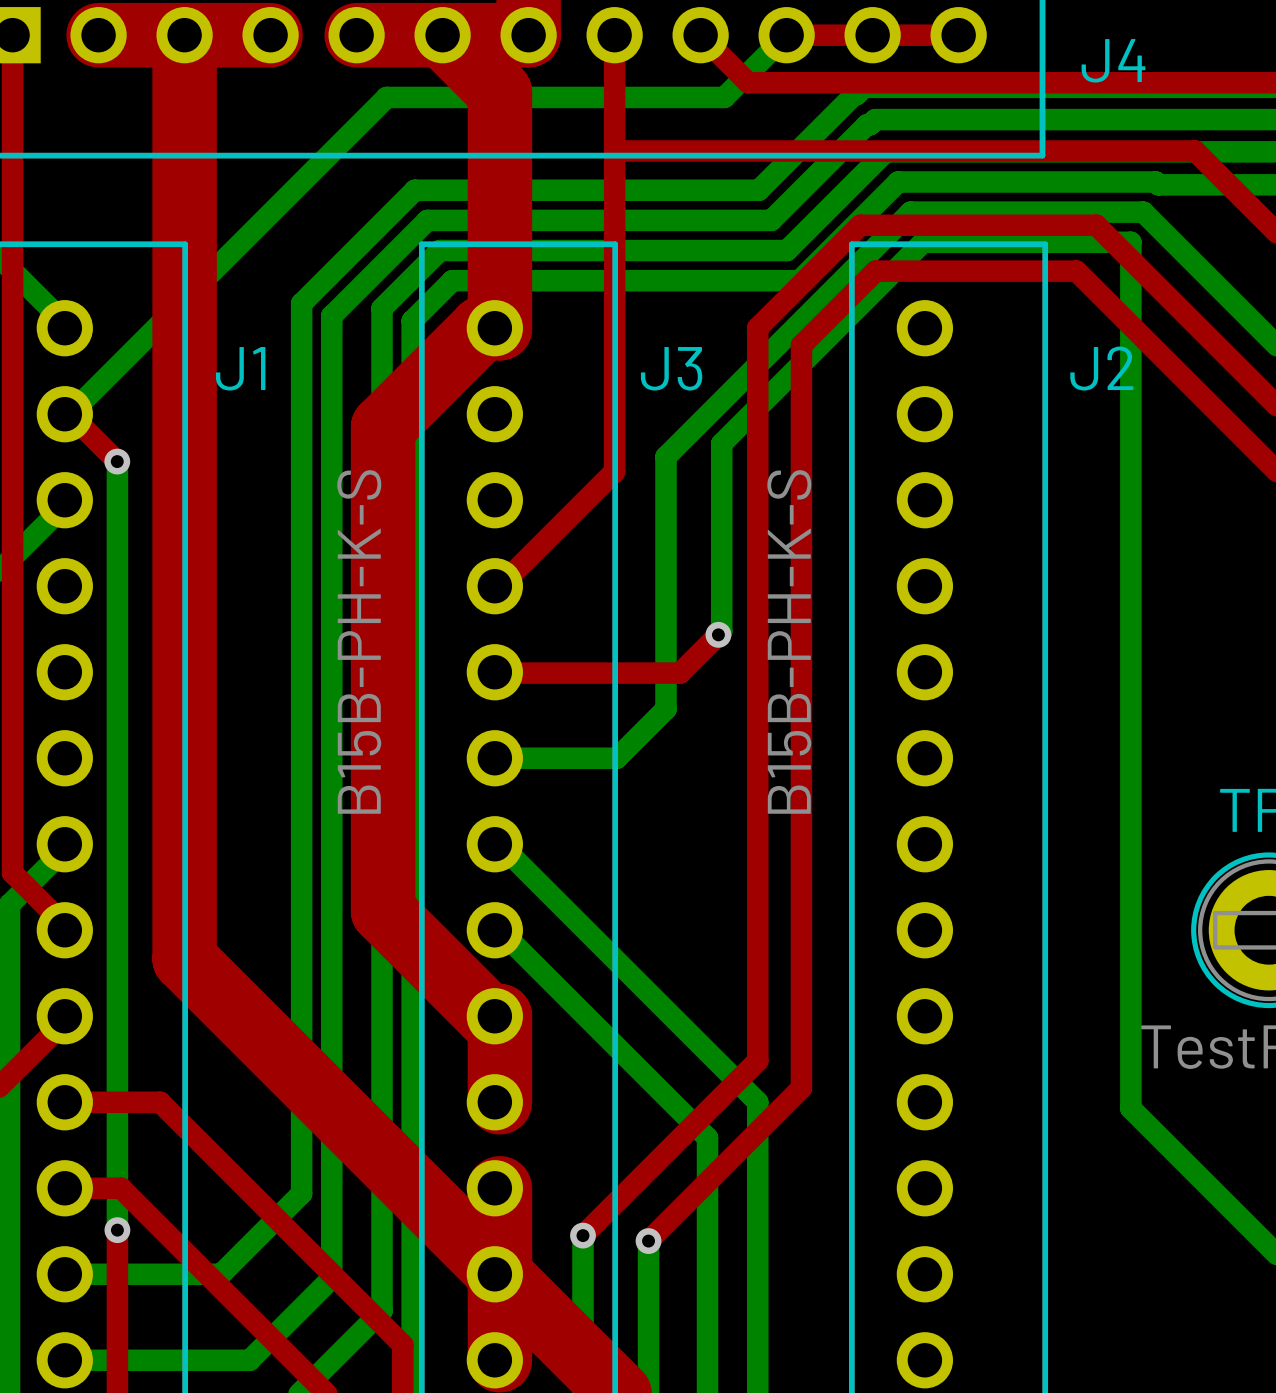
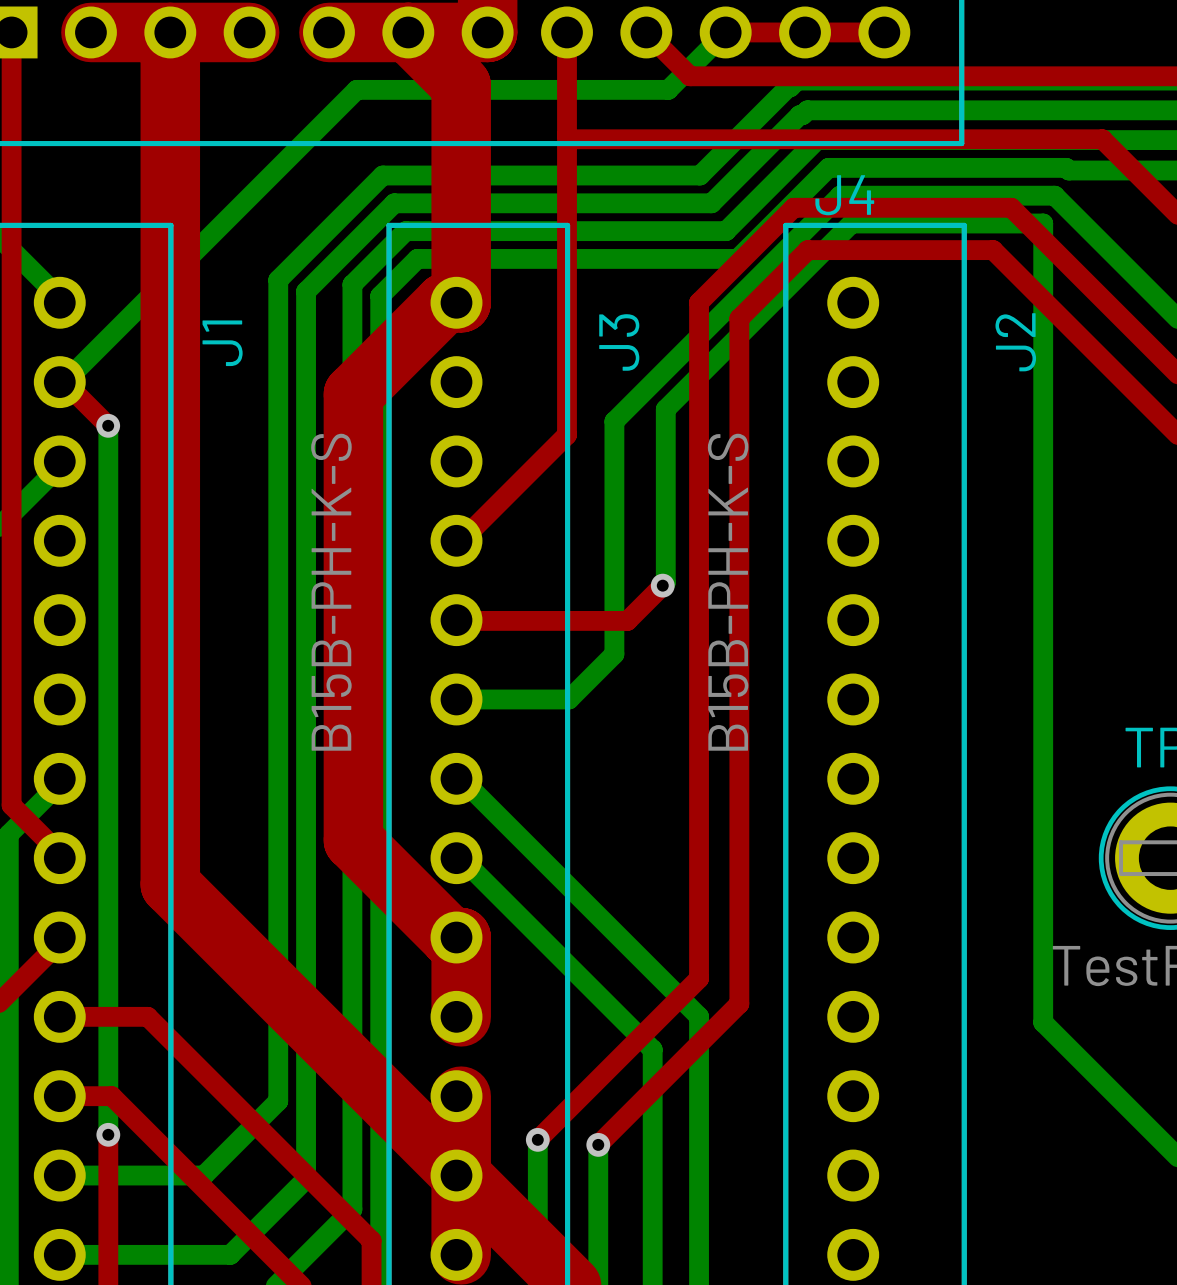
J4 name position: J4 (1113, 60) -> J4 (844, 195)
J1 name rotation: 0° (240, 368) -> 90° counterclockwise (222, 343)
J3 name rotation: 0° (671, 368) -> 90° counterclockwise (619, 342)
J2 name rotation: 0° (1101, 368) -> 90° counterclockwise (1015, 342)

